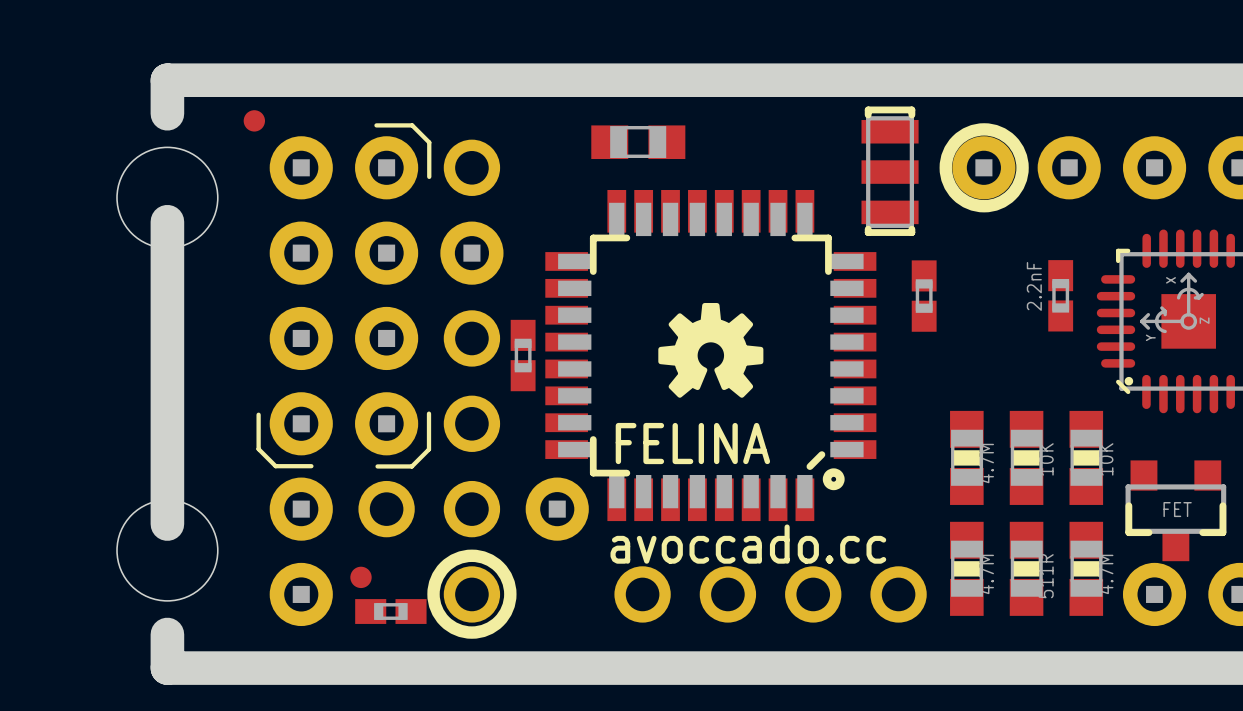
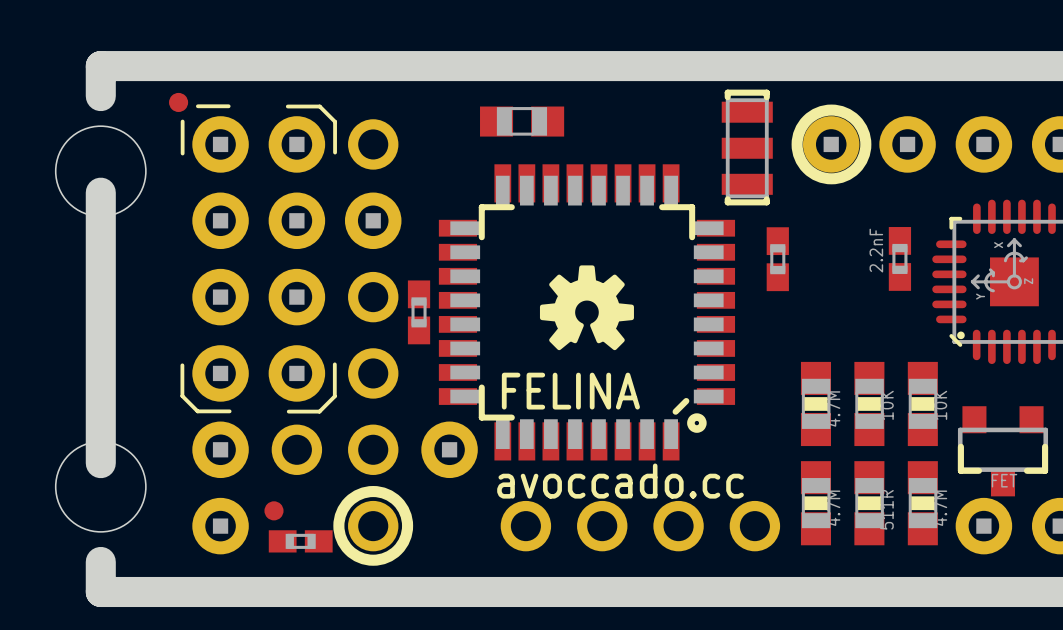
line: none -> (197, 106) (228, 106)
line: none -> (182, 121) (182, 153)
part value position: FET (1177, 509) -> FET (1004, 480)

